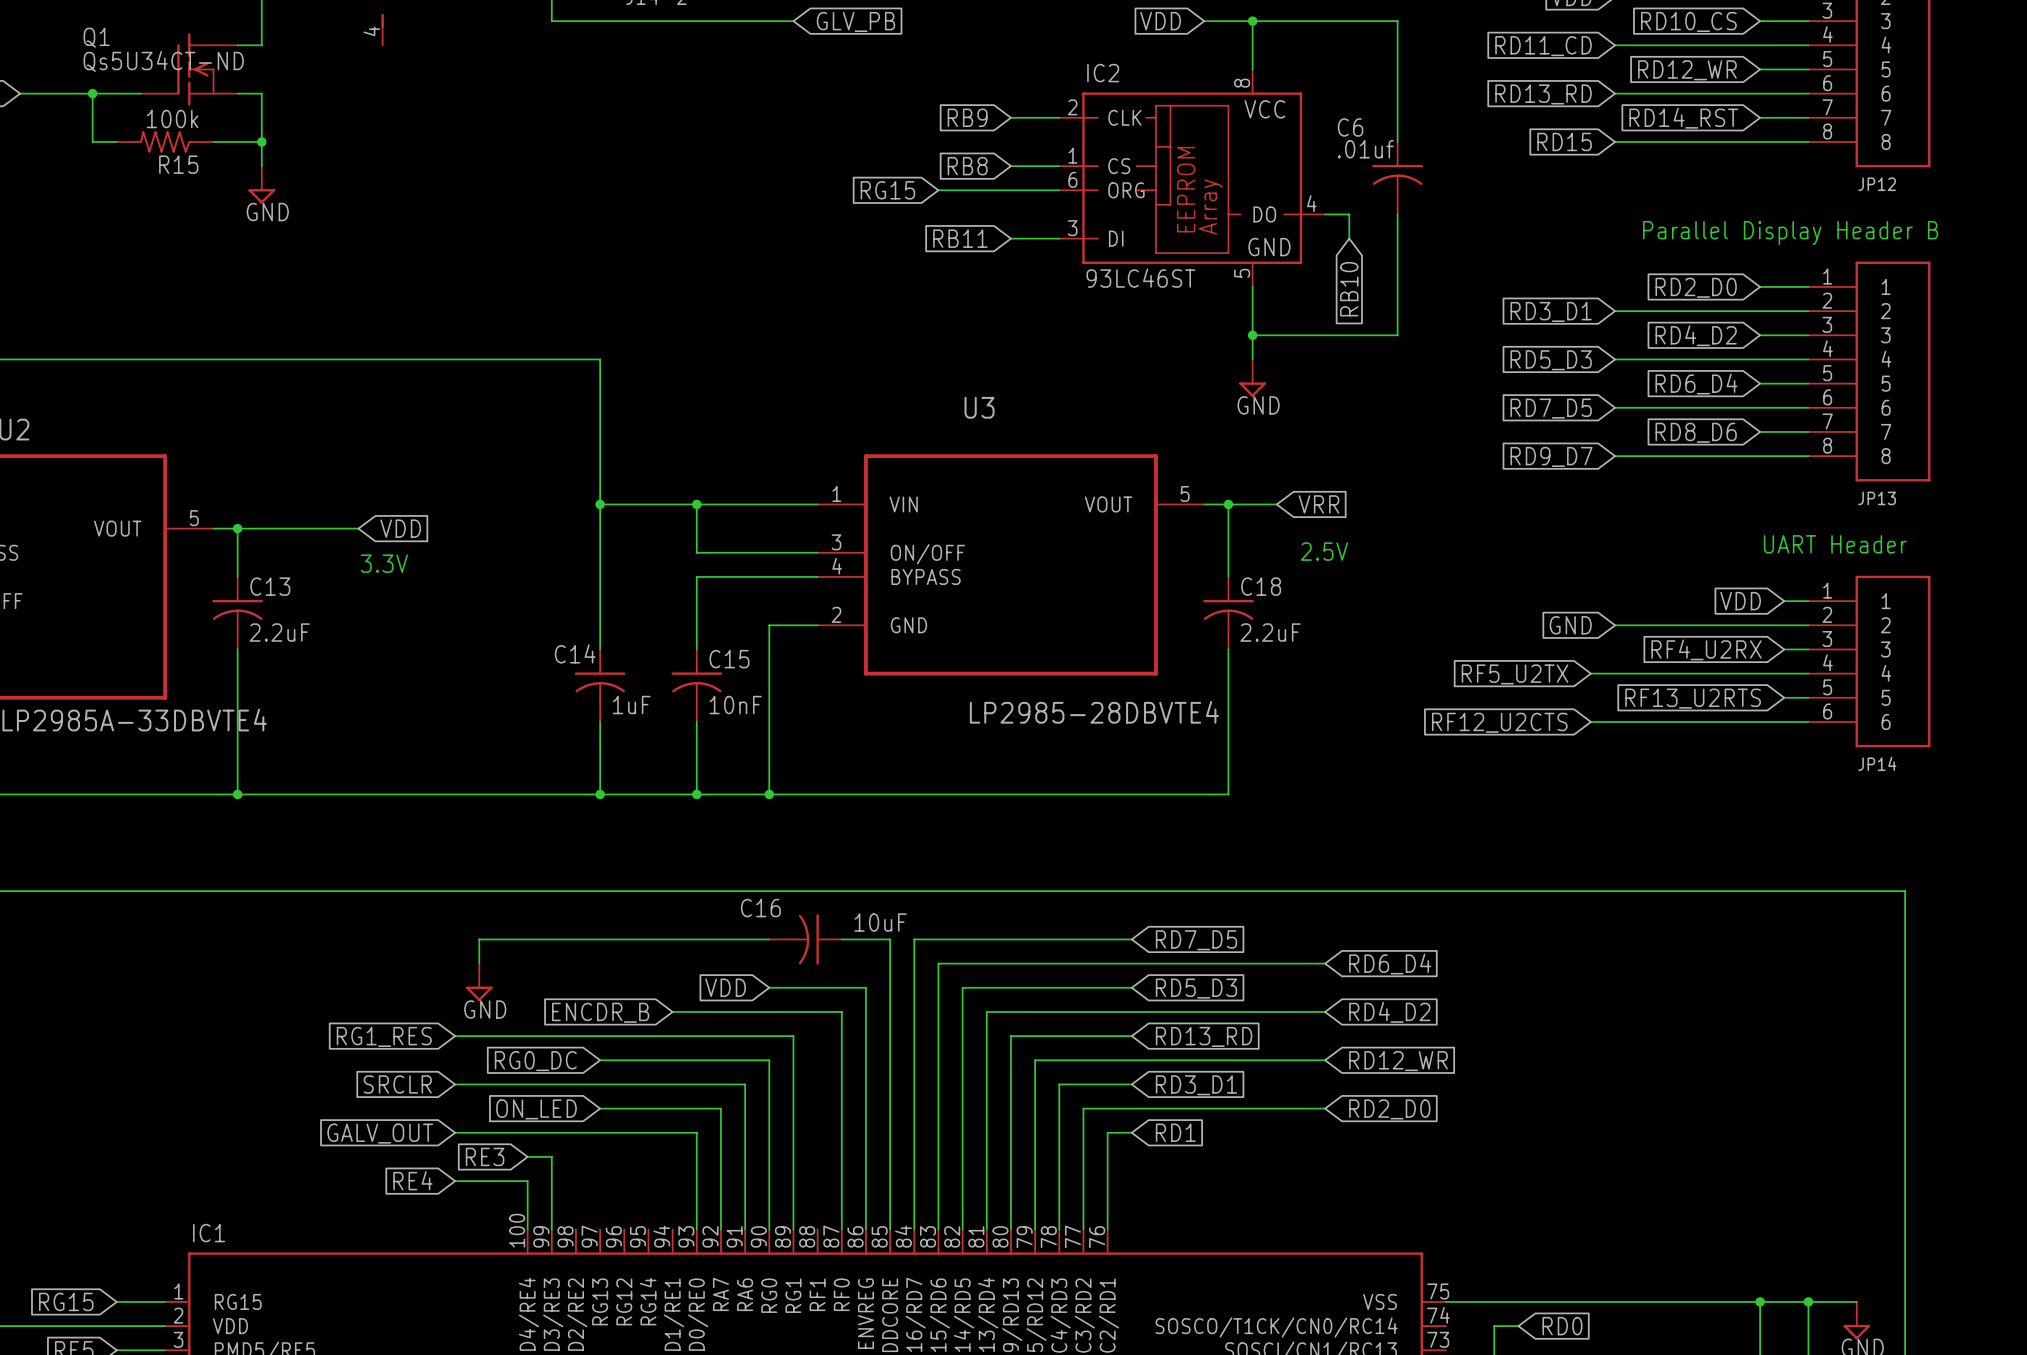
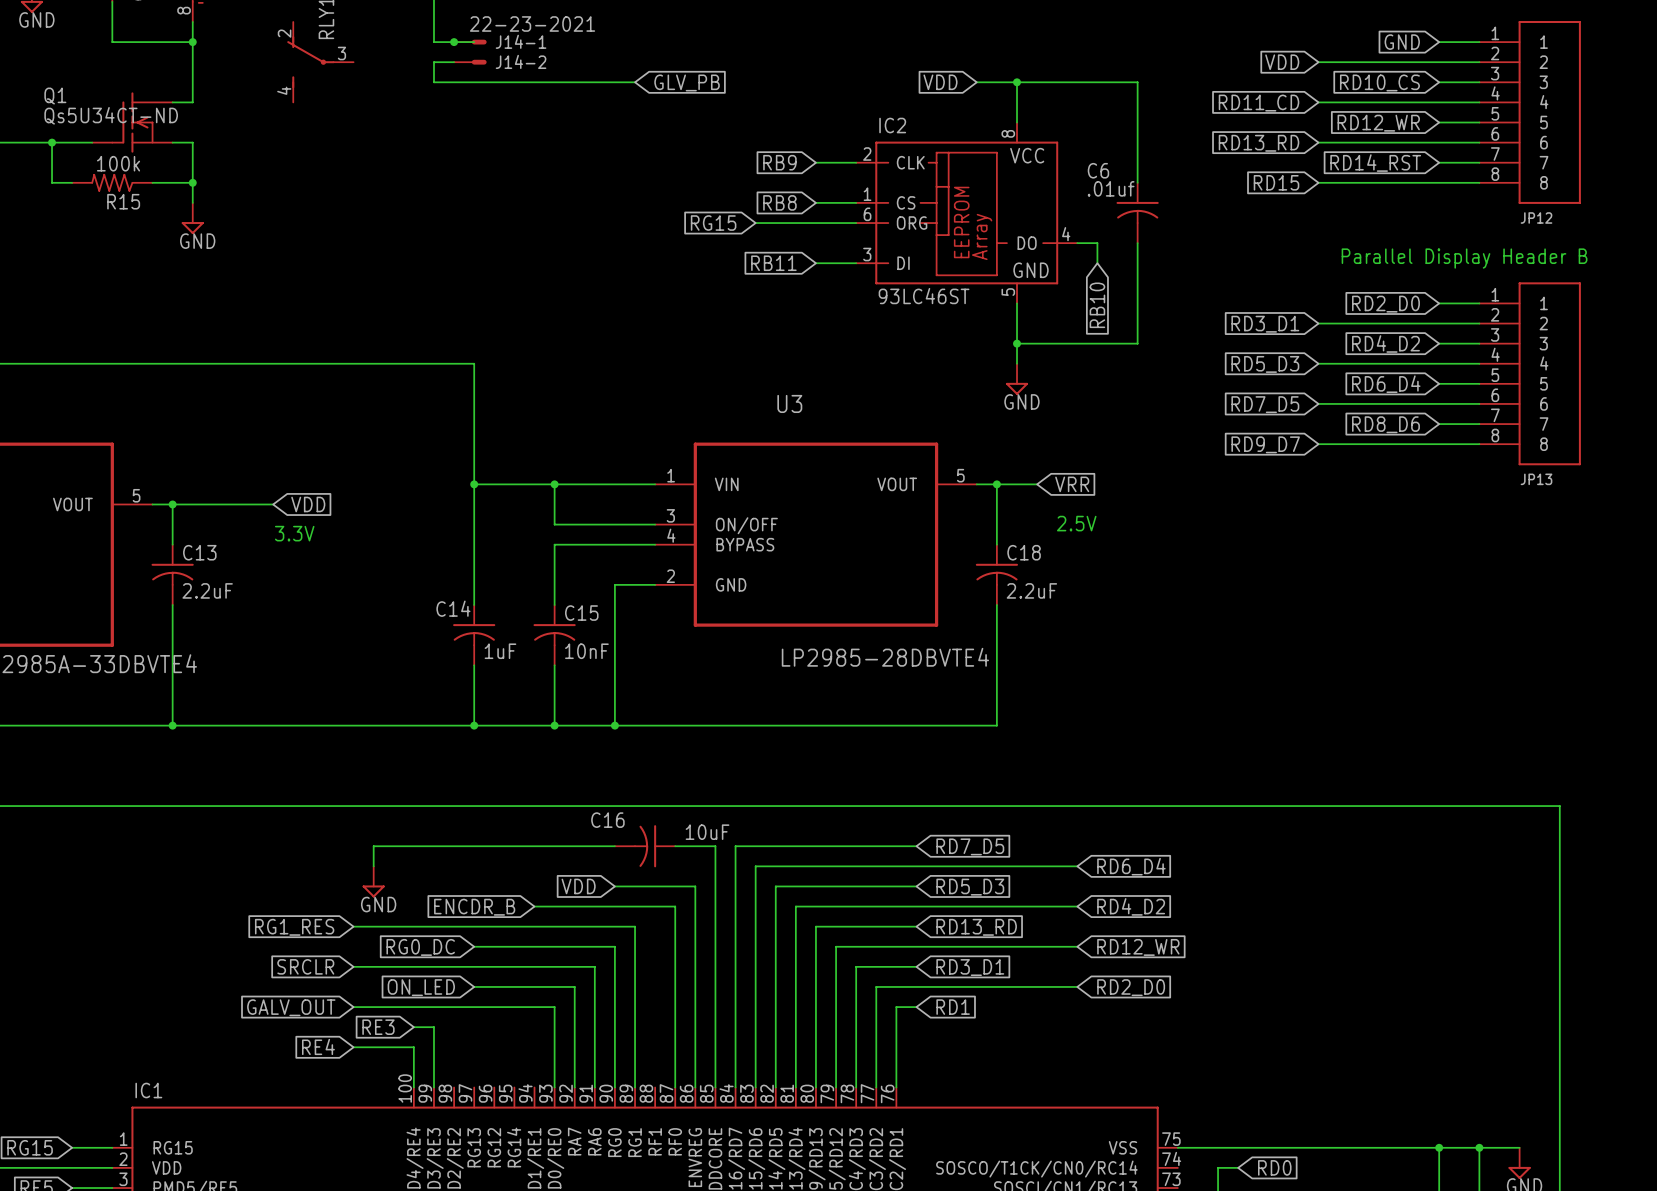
text: UART Header (1835, 544) -> none
global label: VDD (1740, 601) -> none
wire: (1784, 601) (1808, 601) -> none
global label: GND (1570, 625) -> none
wire: (1615, 625) (1808, 625) -> none
global label: RF4_U2RX (1706, 649) -> none
wire: (1784, 649) (1808, 649) -> none
JP14: (1869, 661) -> none
wire: (1590, 673) (1808, 673) -> none
global label: RF5_U2TX (1515, 674) -> none
wire: (1784, 697) (1808, 697) -> none
global label: RF13_U2RTS (1693, 698) -> none
wire: (1590, 721) (1808, 721) -> none
global label: RF12_U2CTS (1499, 722) -> none

